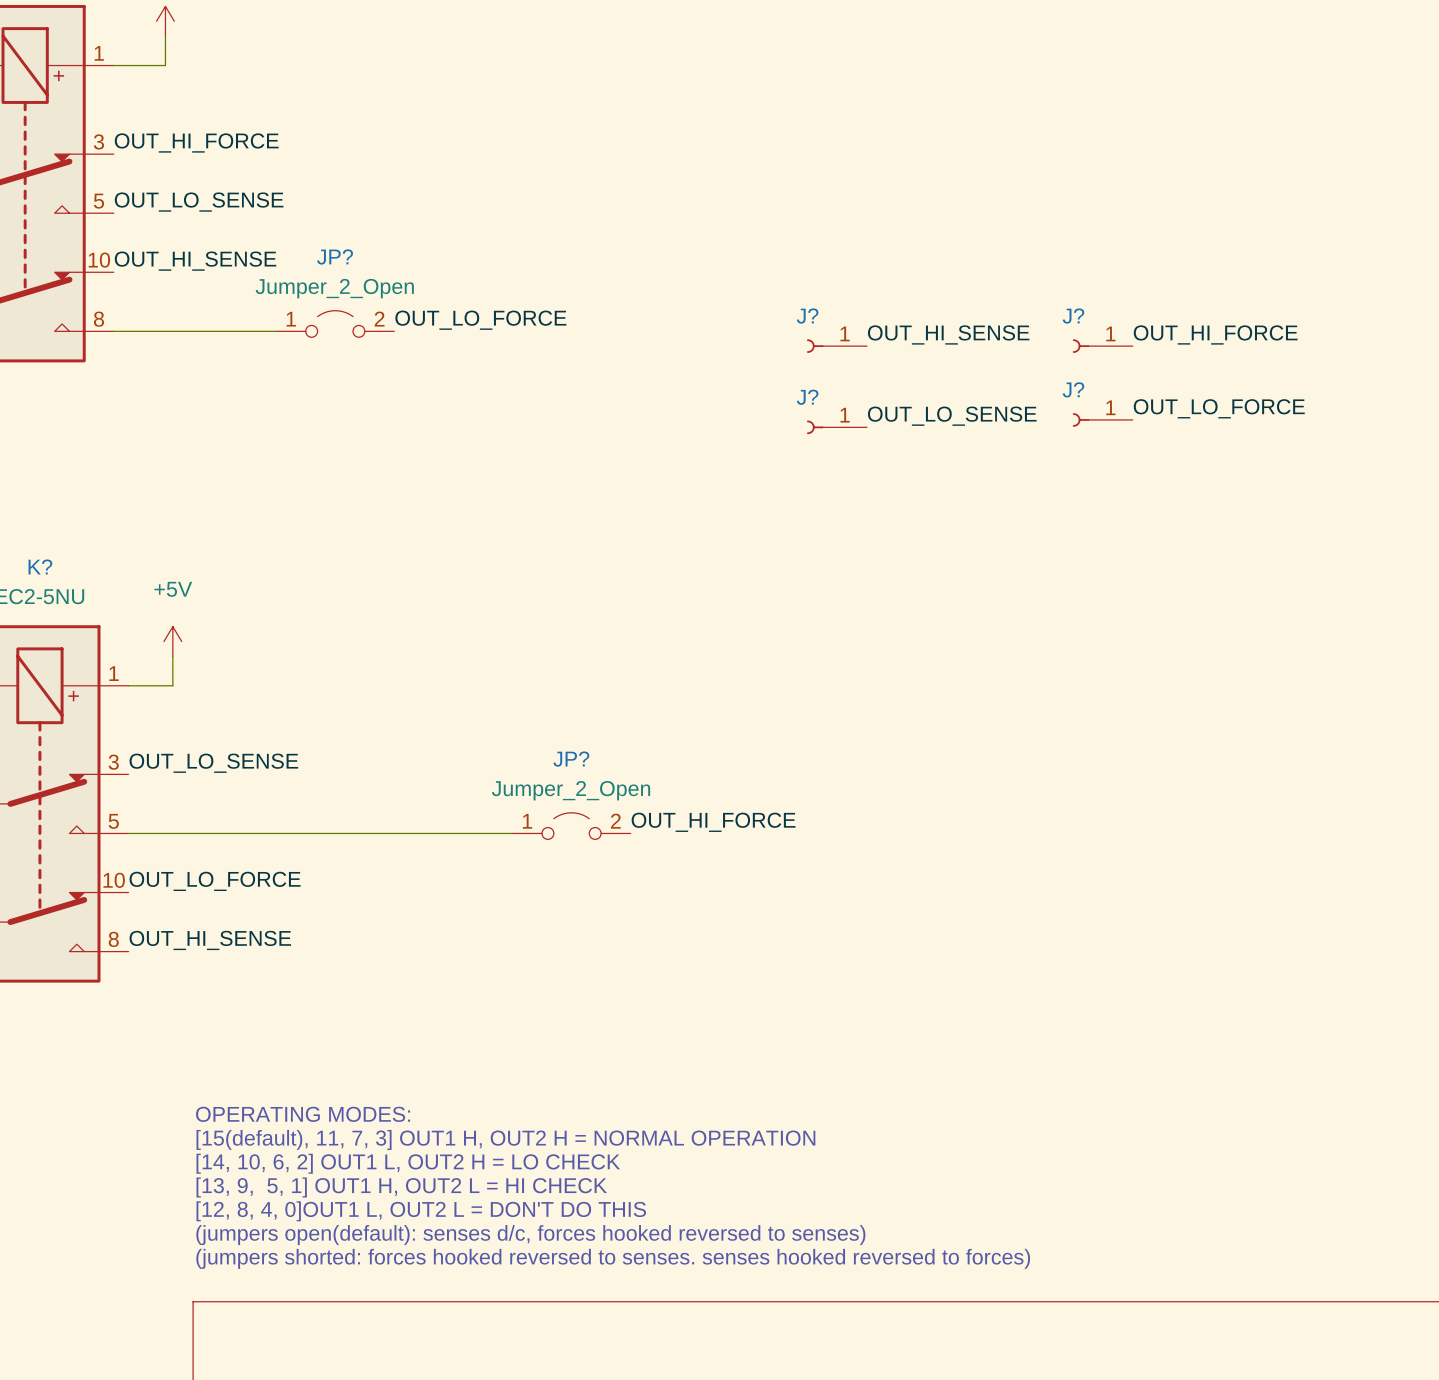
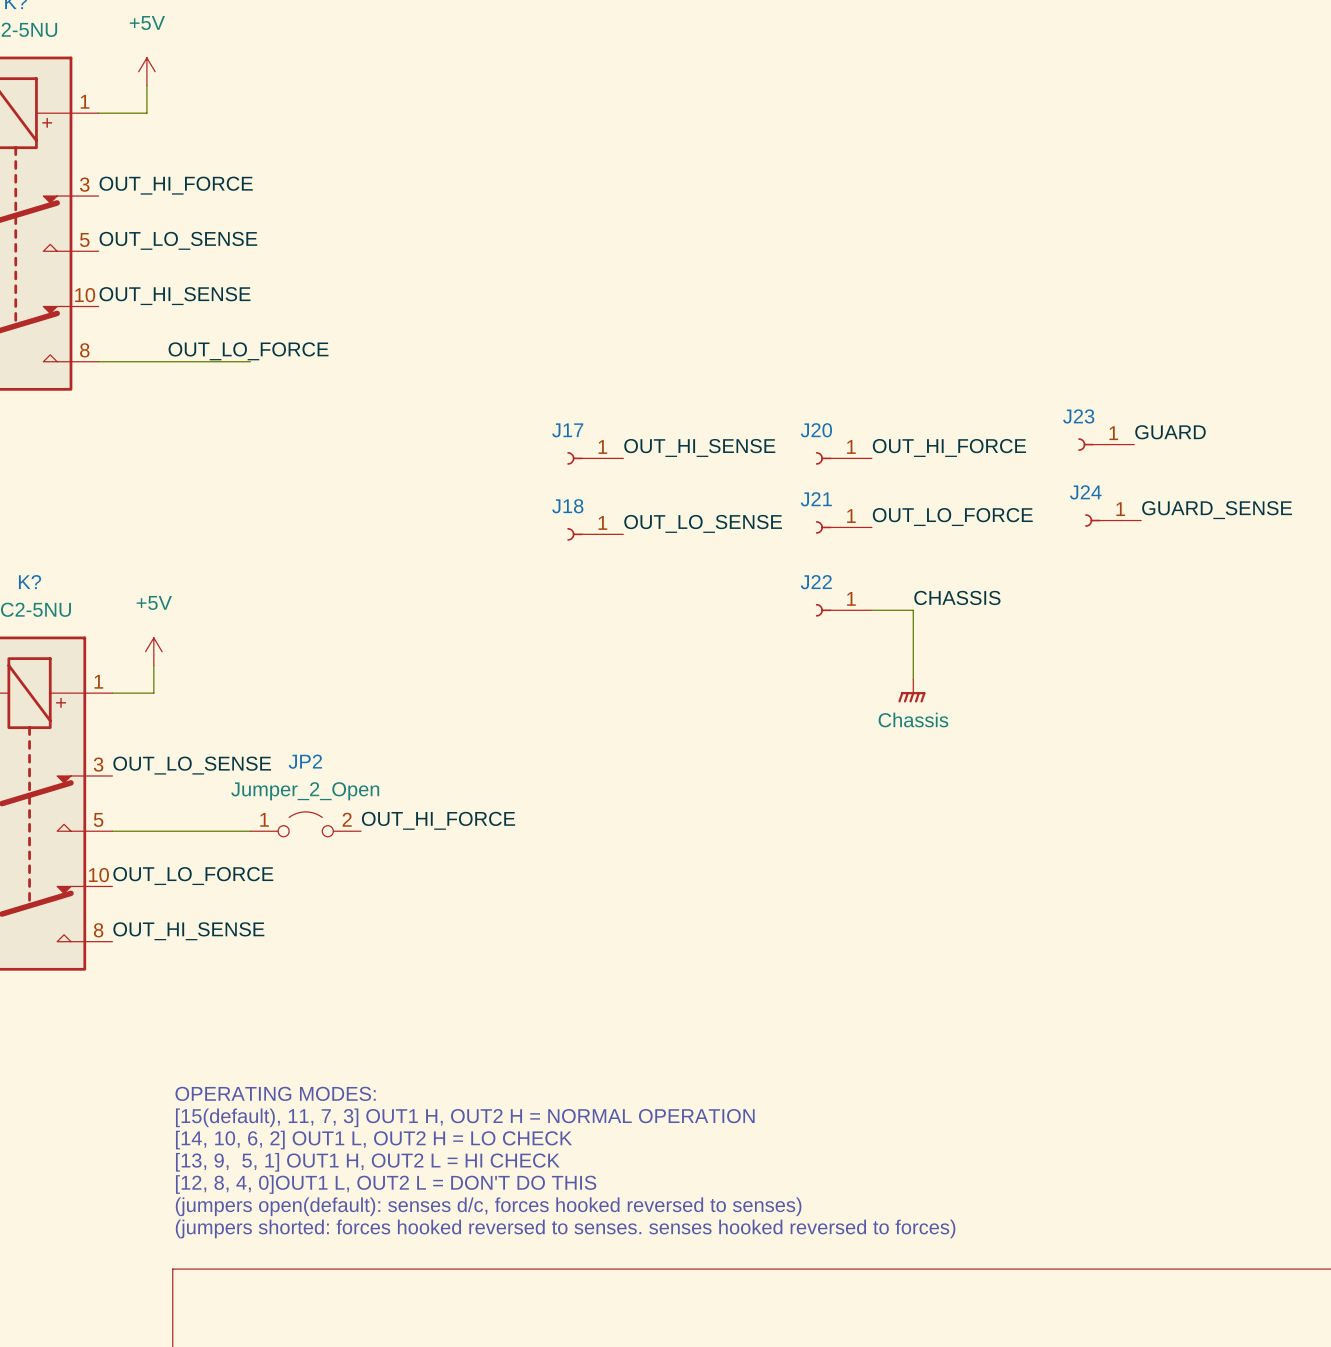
label position: OUT_LO_FORCE (480, 320) -> OUT_LO_FORCE (248, 351)
JP?: Jumper_2_Open (335, 323) -> none
label position: OUT_HI_SENSE (948, 334) -> OUT_HI_SENSE (699, 447)
label position: OUT_HI_FORCE (1215, 334) -> OUT_HI_FORCE (949, 447)
J?: (836, 346) -> none
J?: (1102, 346) -> none
label: none -> GUARD (1170, 432)
label position: OUT_LO_FORCE (1219, 408) -> OUT_LO_FORCE (952, 517)
label position: OUT_LO_SENSE (952, 416) -> OUT_LO_SENSE (703, 523)
J?: (1102, 419) -> none
J23: none -> (1106, 444)
J?: (836, 427) -> none
J17: none -> (595, 458)
J20: none -> (843, 458)
label: none -> GUARD_SENSE (1217, 510)
J24: none -> (1113, 520)
J21: none -> (843, 527)
J18: none -> (595, 534)
label: none -> CHASSIS (957, 597)
J22: none -> (843, 610)
wire: none -> (871, 610) (913, 610) (913, 679)
power symbol: none -> (911, 690)
label position: OUT_HI_FORCE (713, 822) -> OUT_HI_FORCE (438, 820)
JP2: none -> Jumper_2_Open (305, 824)
JP?: Jumper_2_Open (571, 826) -> none
wire: (276, 833) (512, 833) -> none

